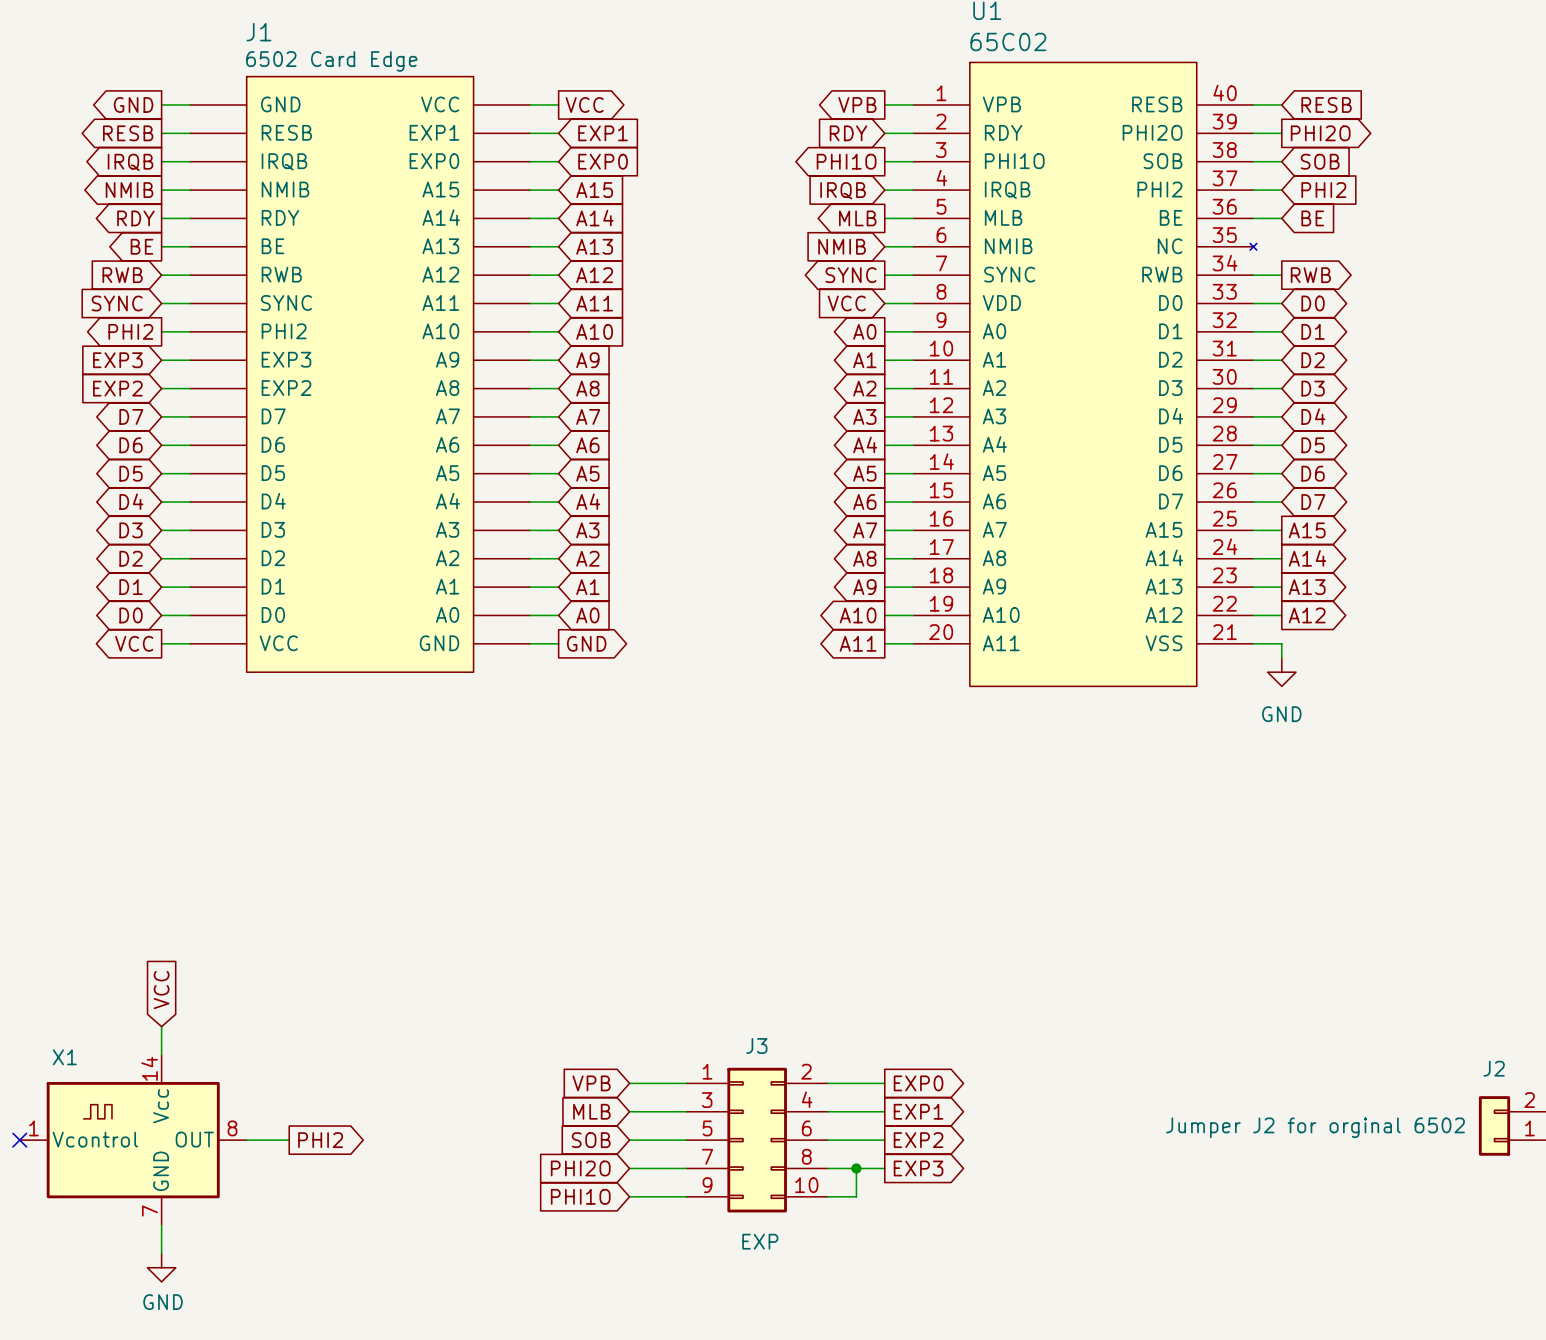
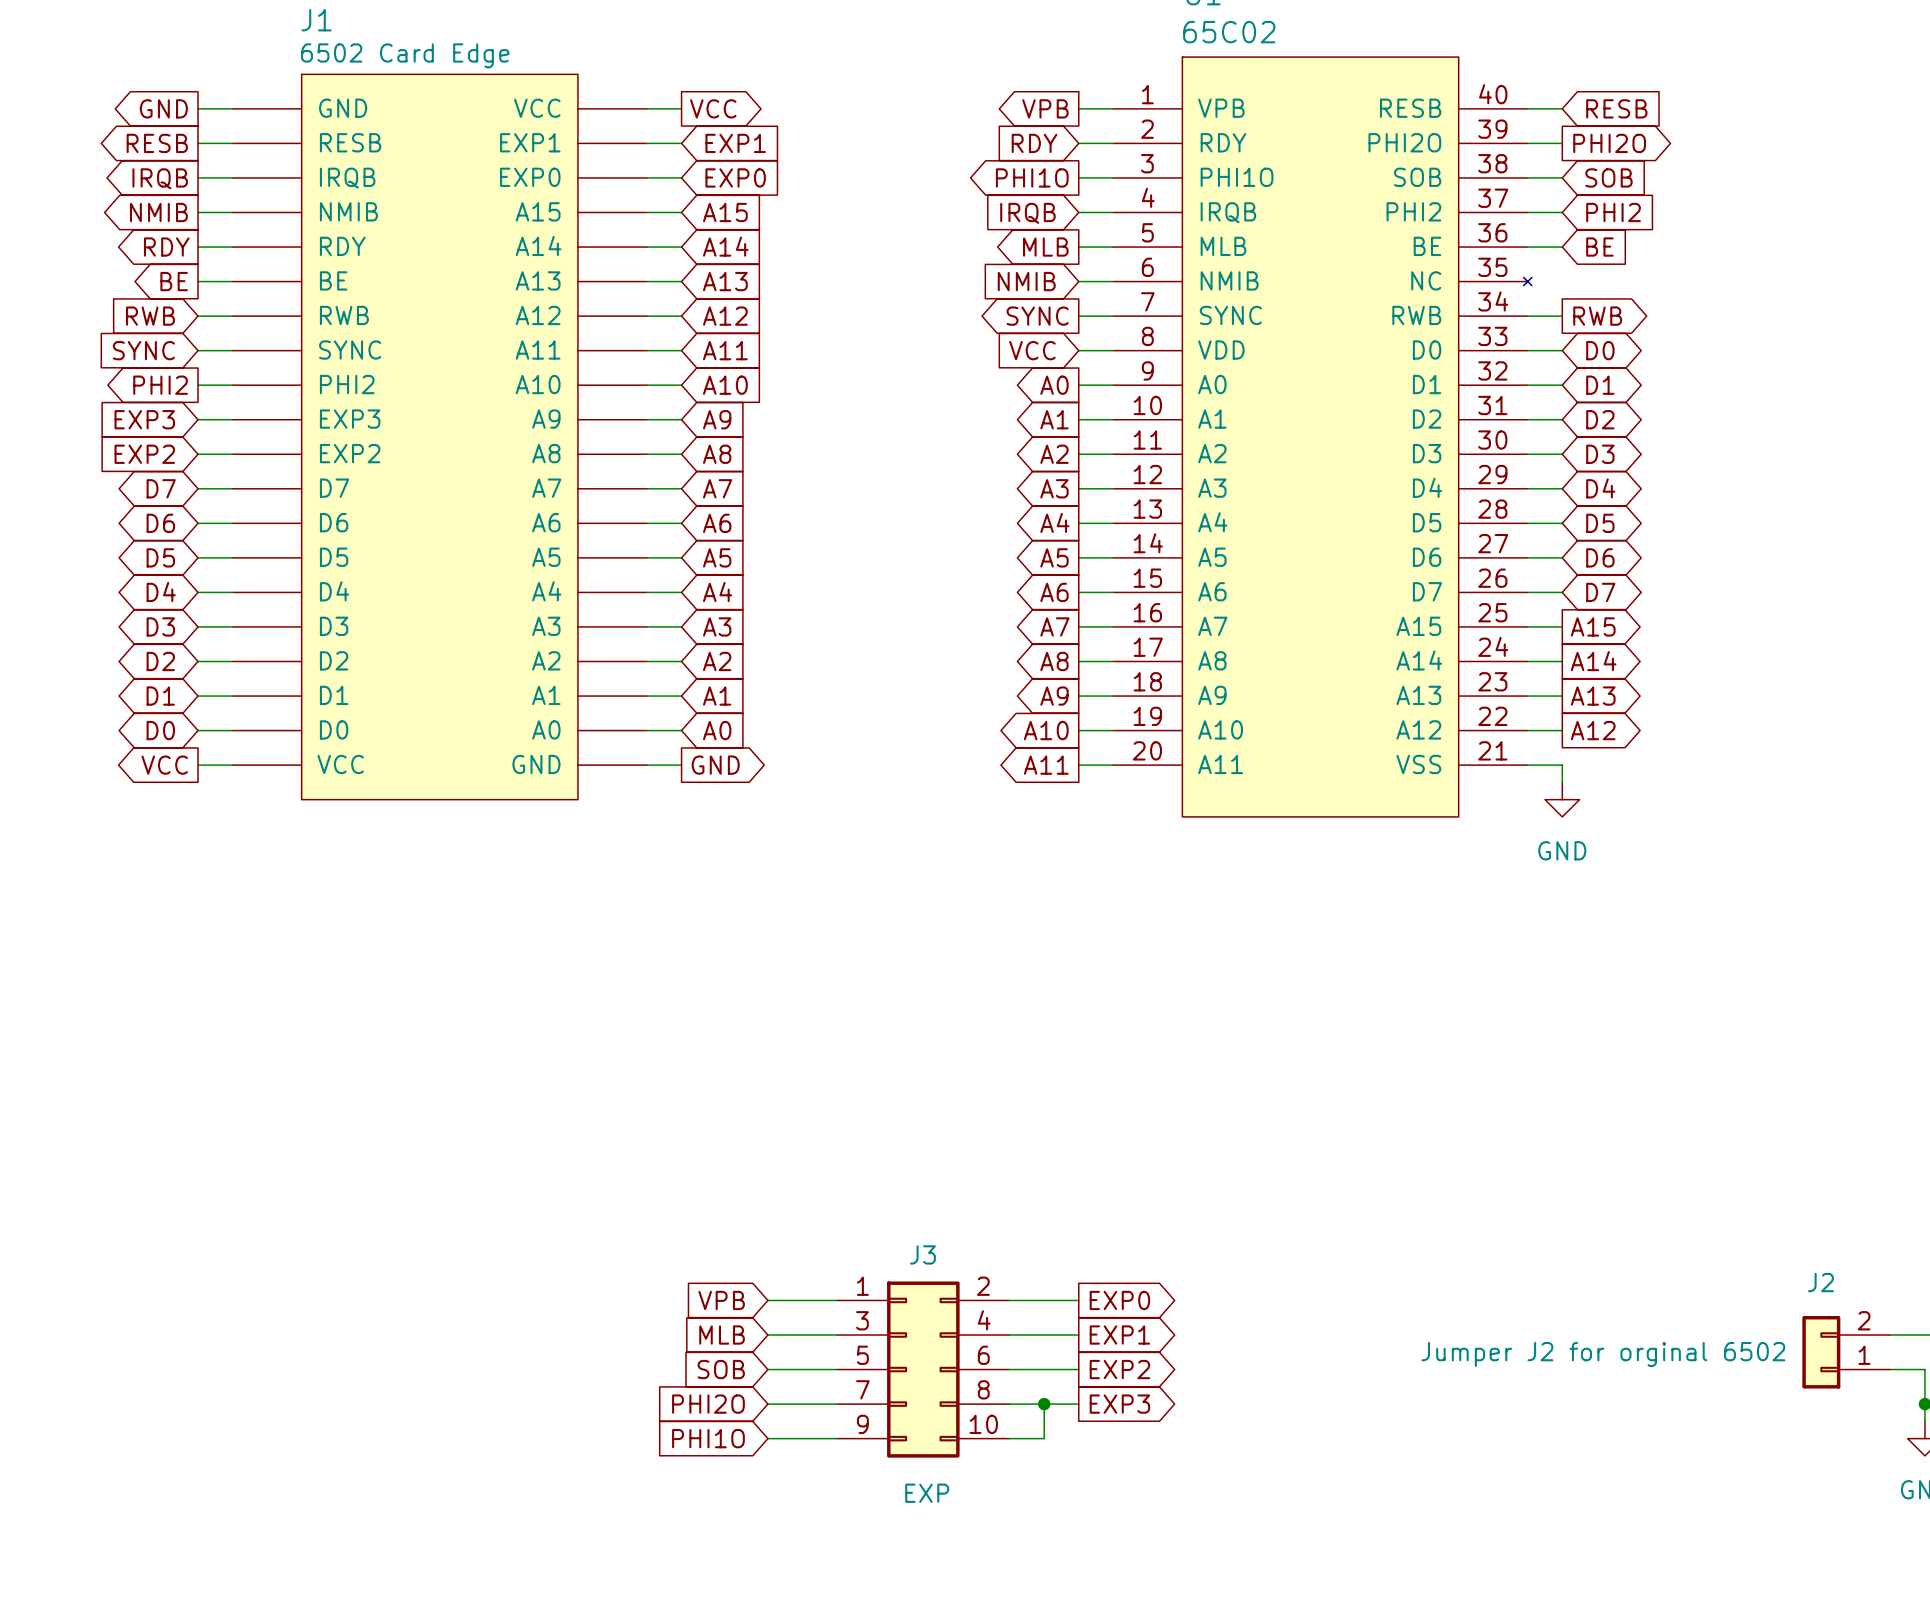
global label: VCC (161, 990) -> none
wire: (161, 1026) (161, 1055) -> none
no-connect mark: (19, 1140) -> none
X1: (133, 1140) -> none
wire: (246, 1140) (289, 1140) -> none
global label: PHI2 (320, 1140) -> none
wire: (161, 1225) (161, 1253) -> none
power symbol: GND (161, 1267) -> none

